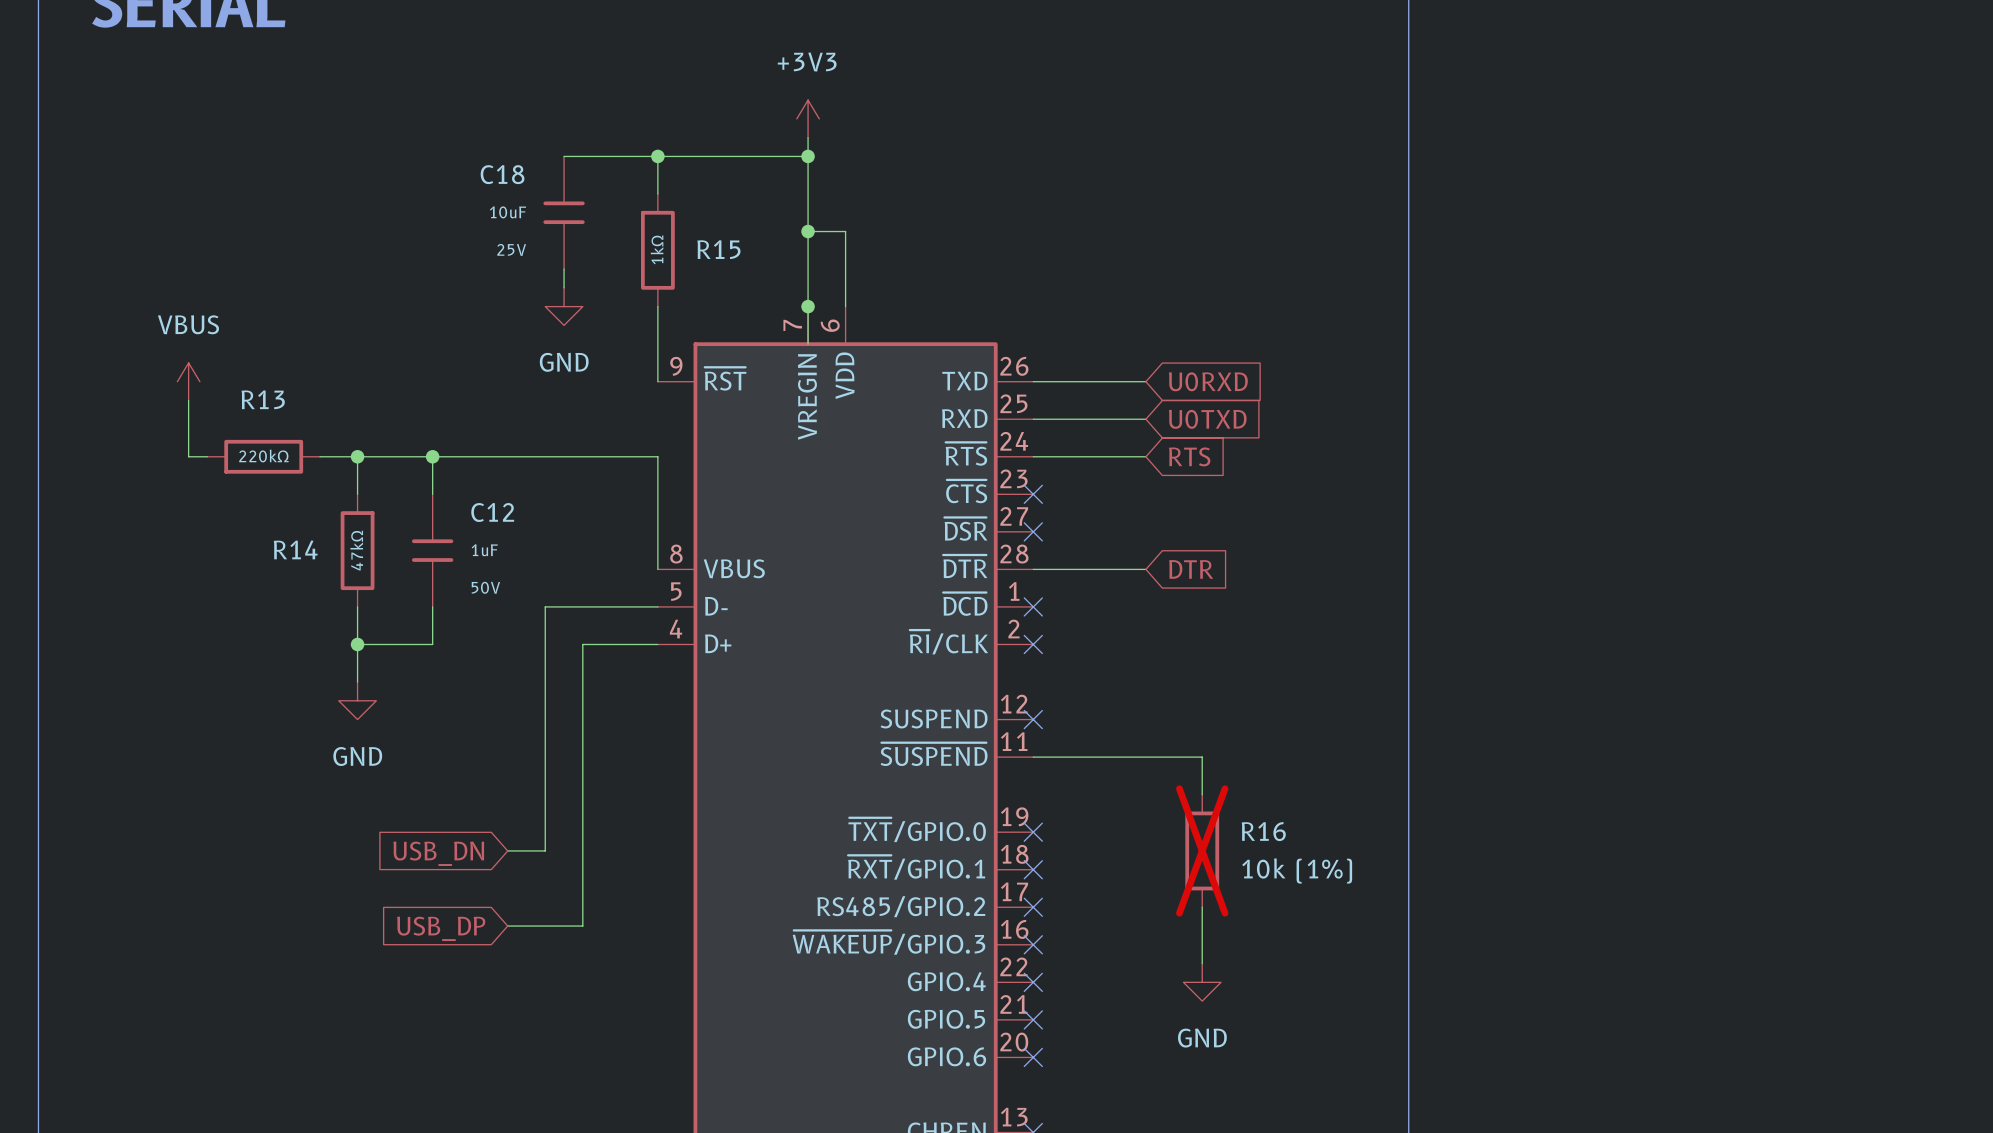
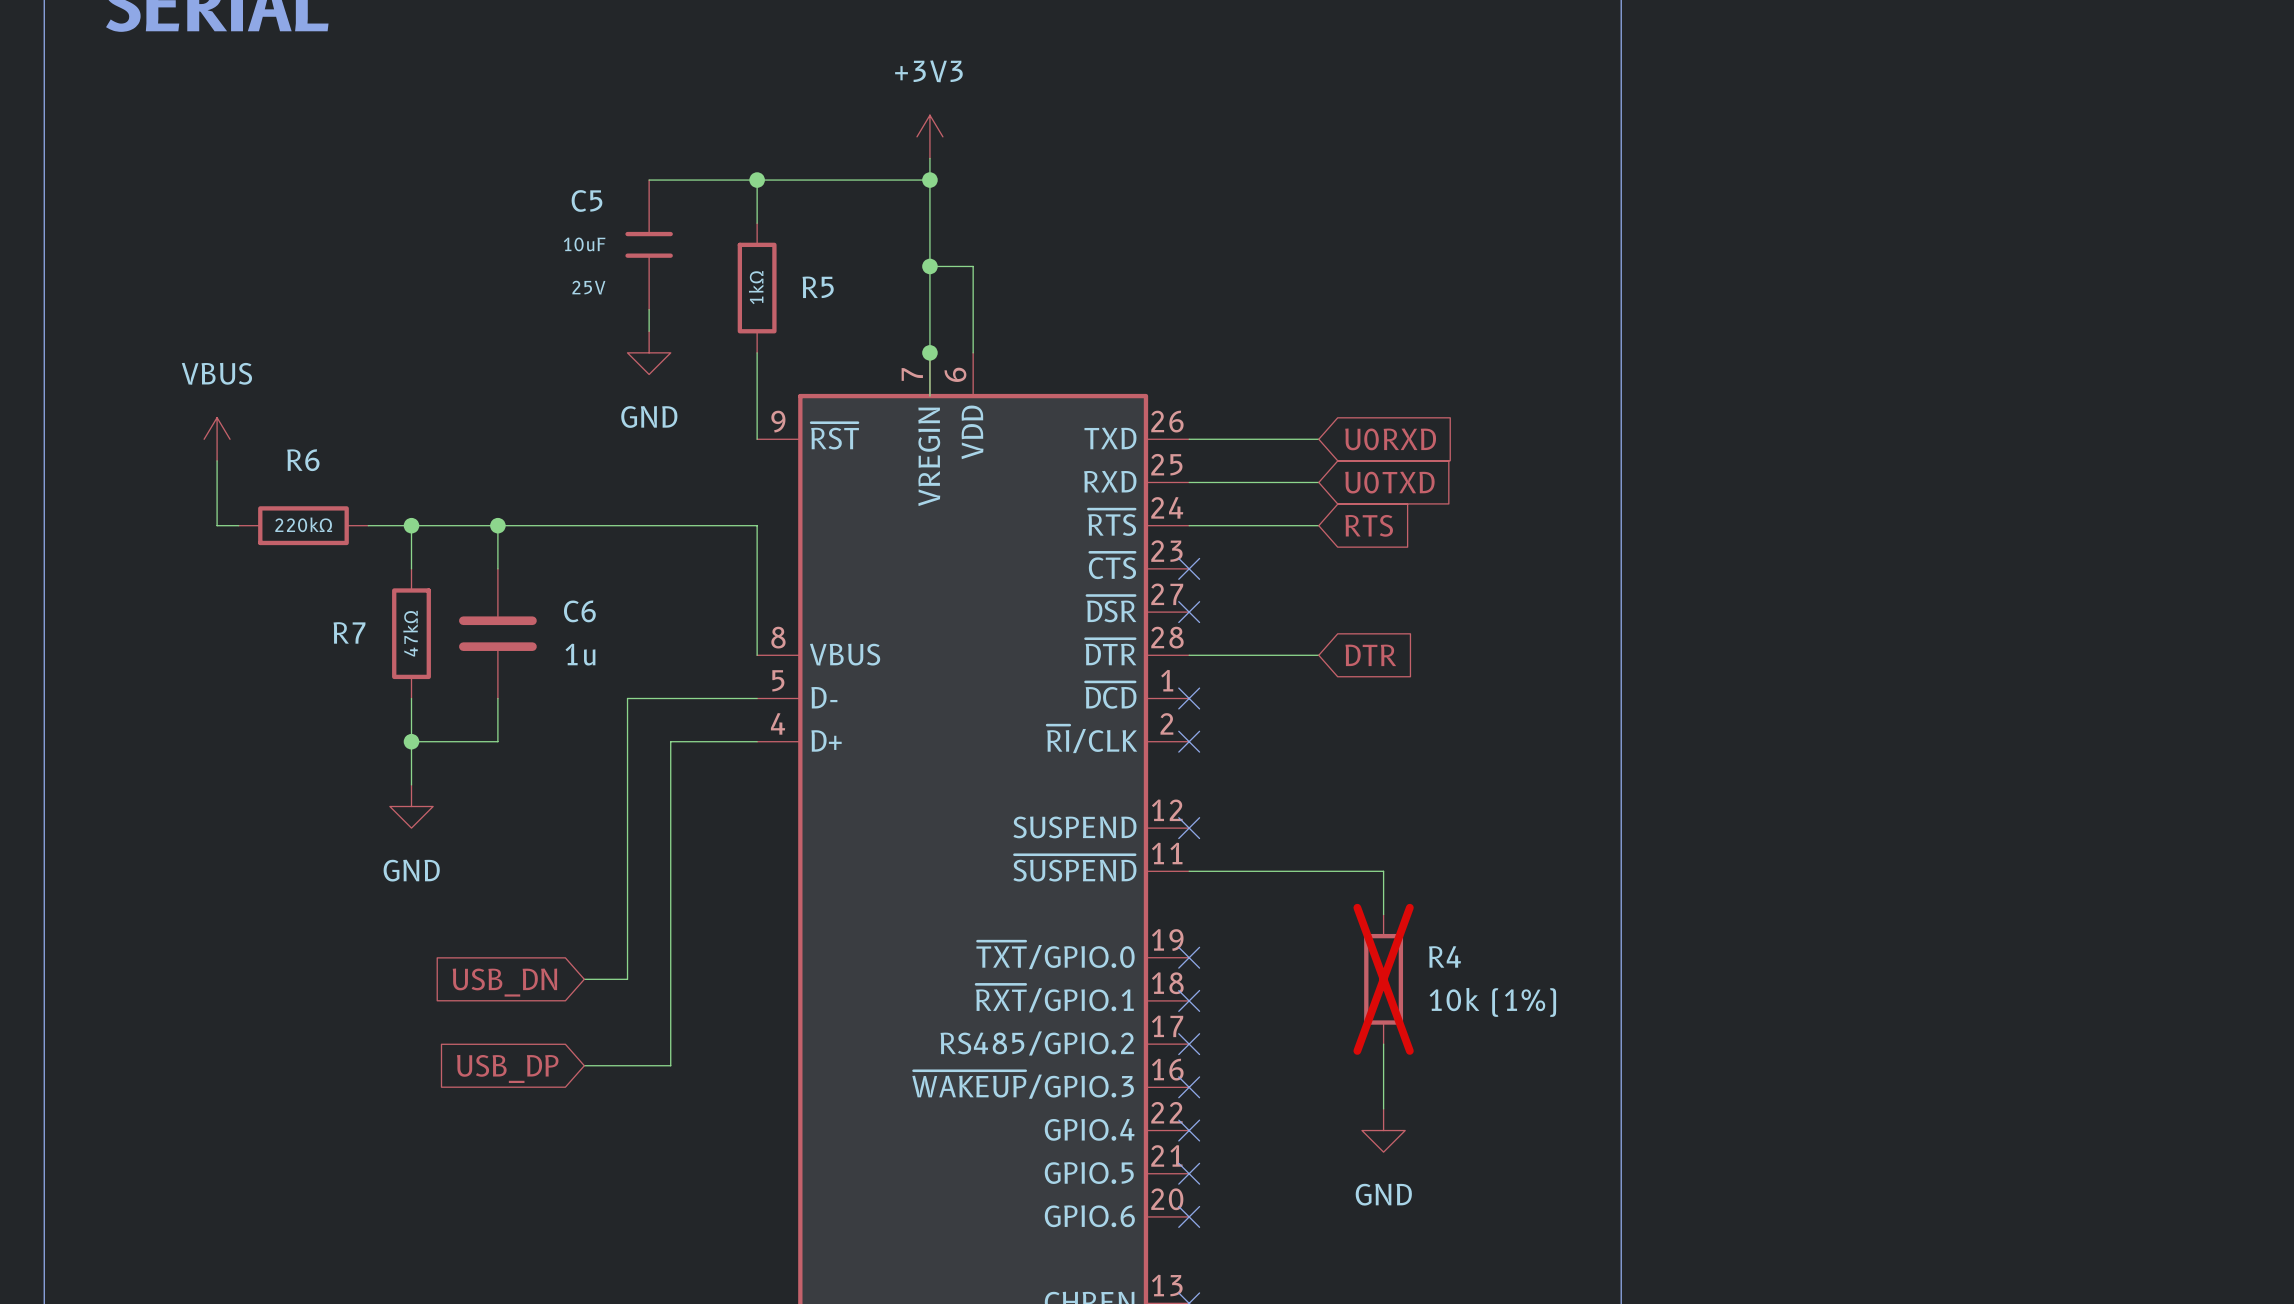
C18 name: C18 (502, 174) -> C5 (587, 200)
R15 name: R15 (718, 249) -> R5 (818, 287)
R13 name: R13 (263, 399) -> R6 (303, 460)
R14 name: R14 (295, 549) -> R7 (349, 632)
C12: 1uF (432, 550) -> none
C6: none -> 1u (497, 633)
R16 name: R16 (1263, 831) -> R4 (1444, 956)

